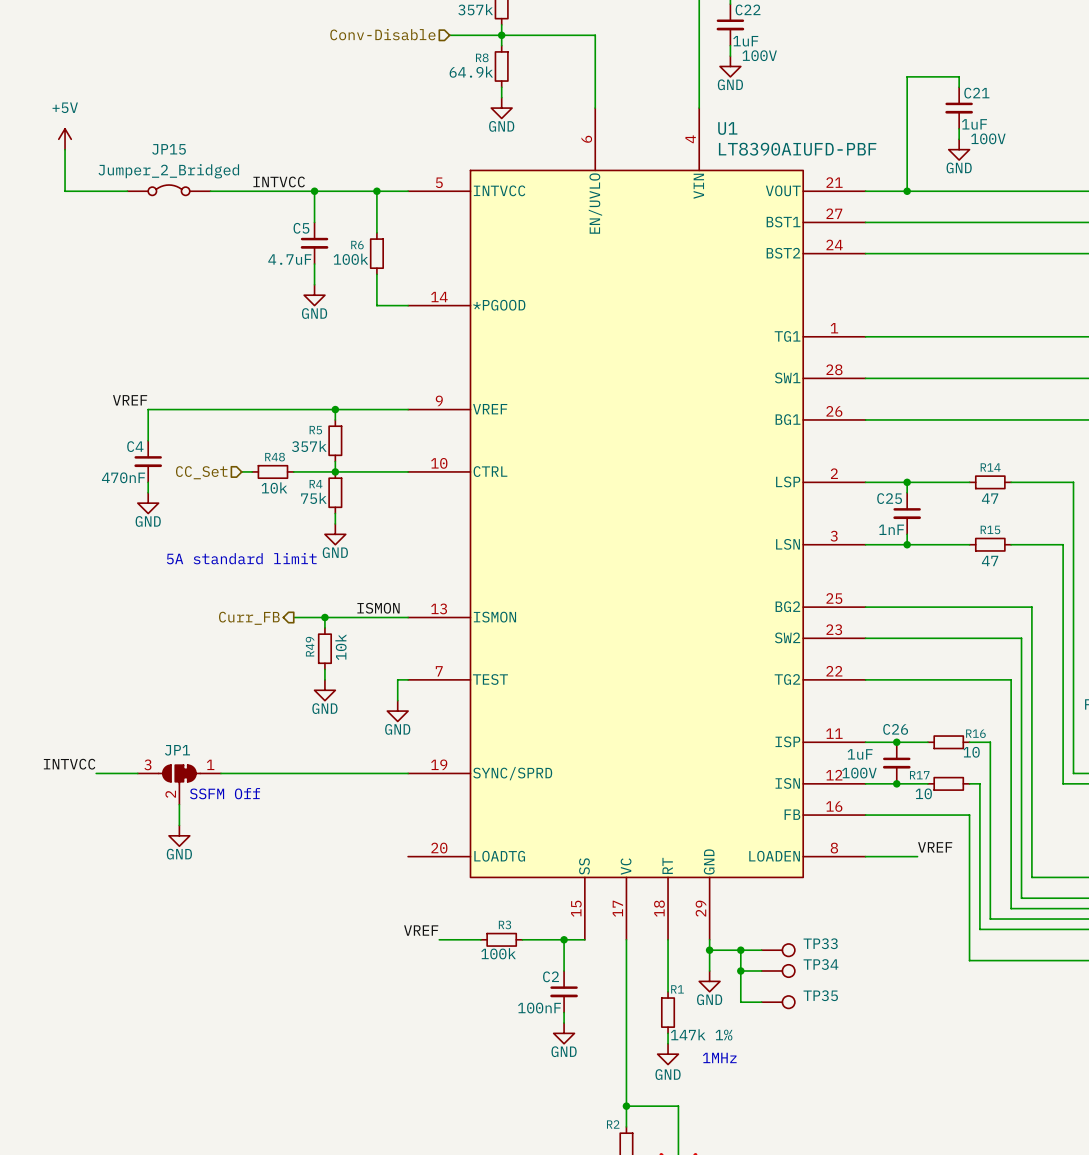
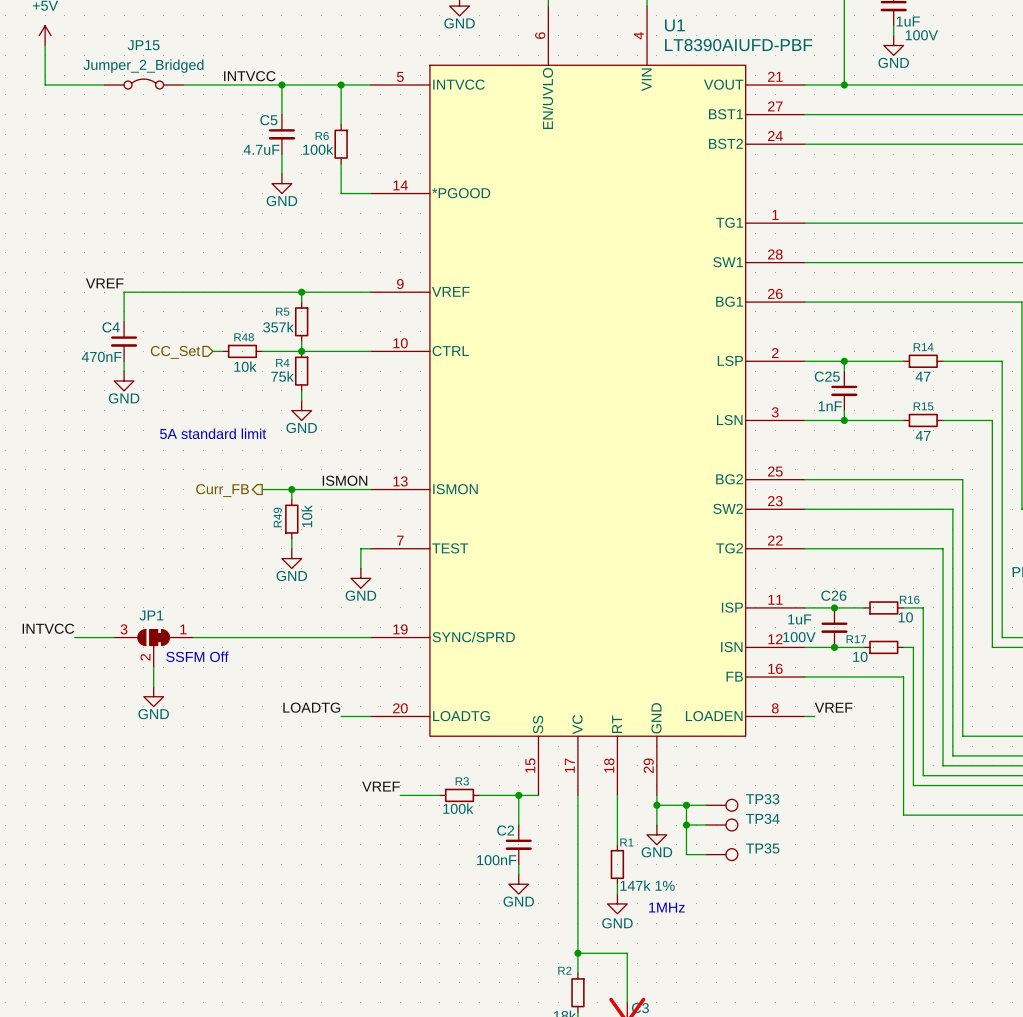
label: none -> LOADTG (311, 707)
label position: VREF (935, 847) -> VREF (833, 707)
wire: none -> (341, 716) (370, 716)
wire: (875, 856) (917, 856) -> none

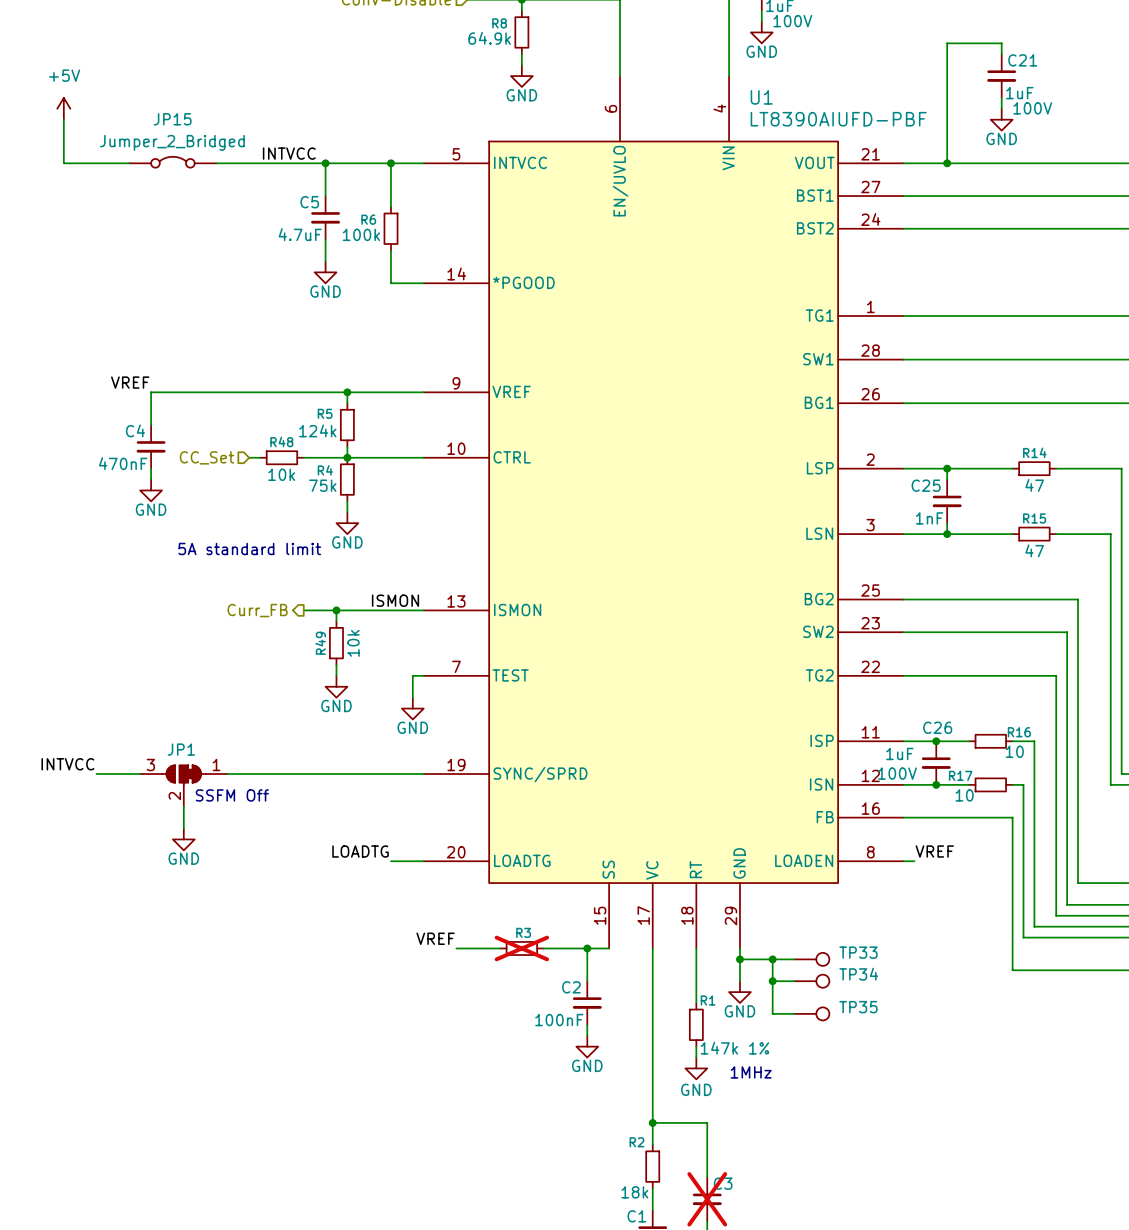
R5 value: 357k (278, 327) -> 124k (317, 430)
R3 do-not-place cross: none -> (521, 948)
R3 value: 100k (458, 808) -> none

